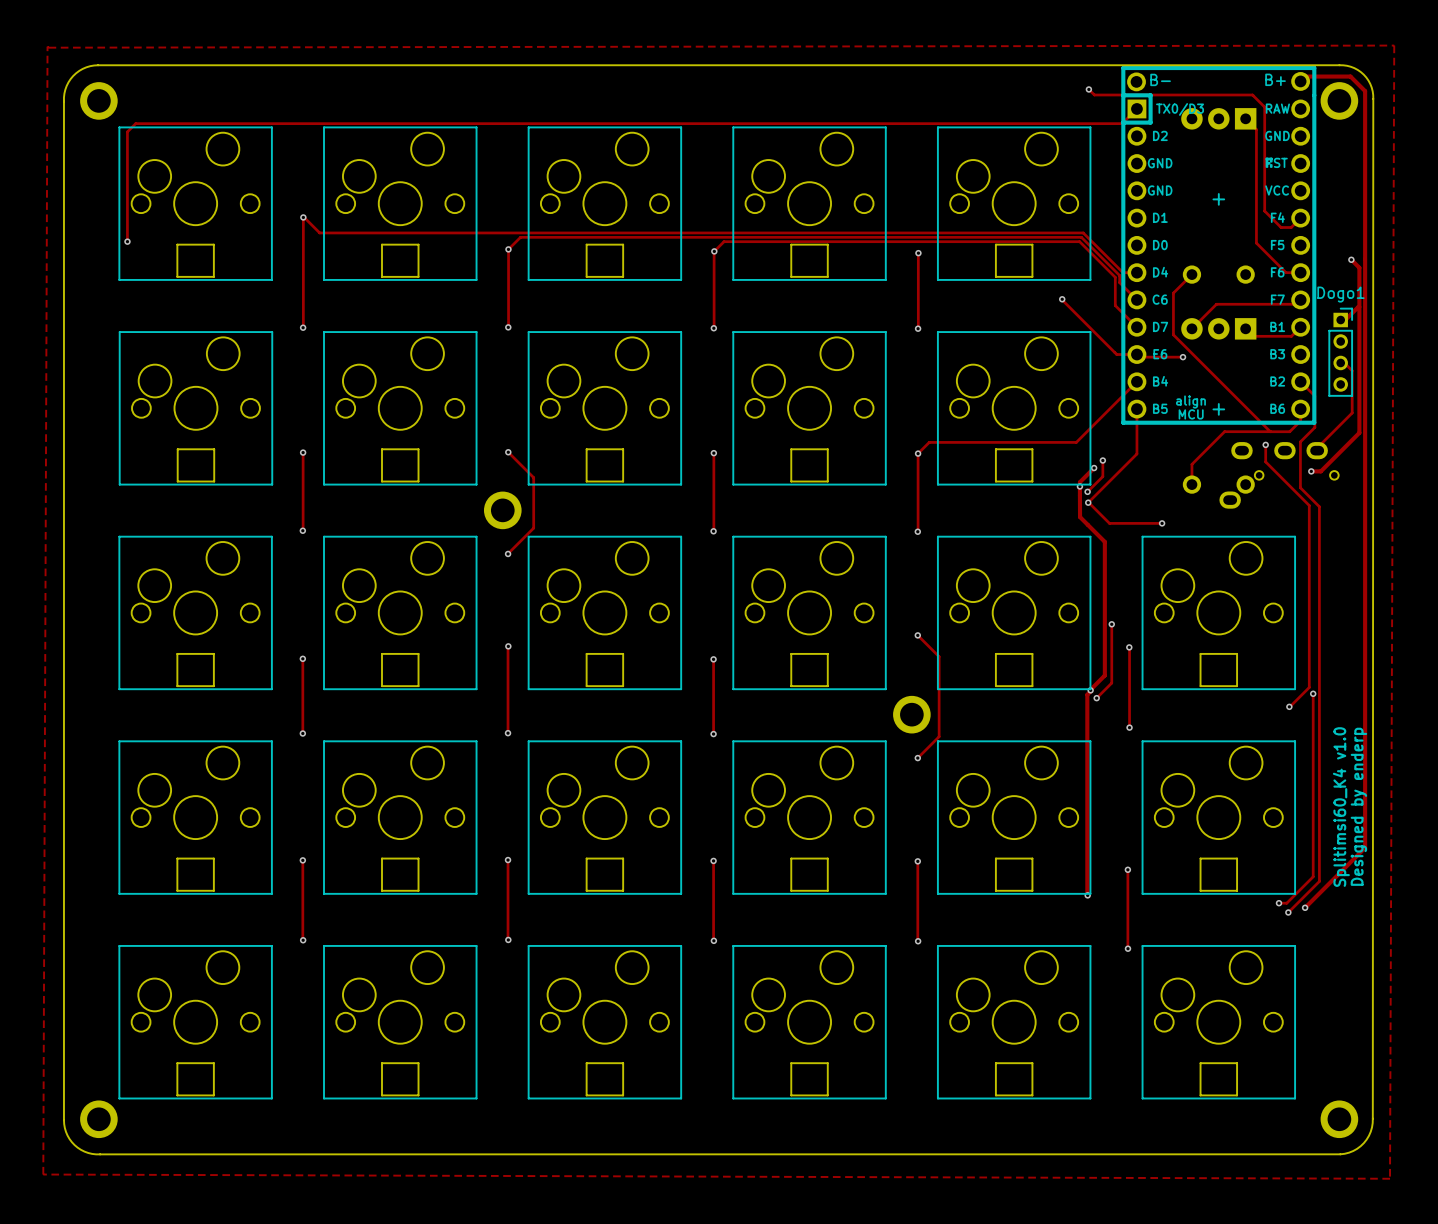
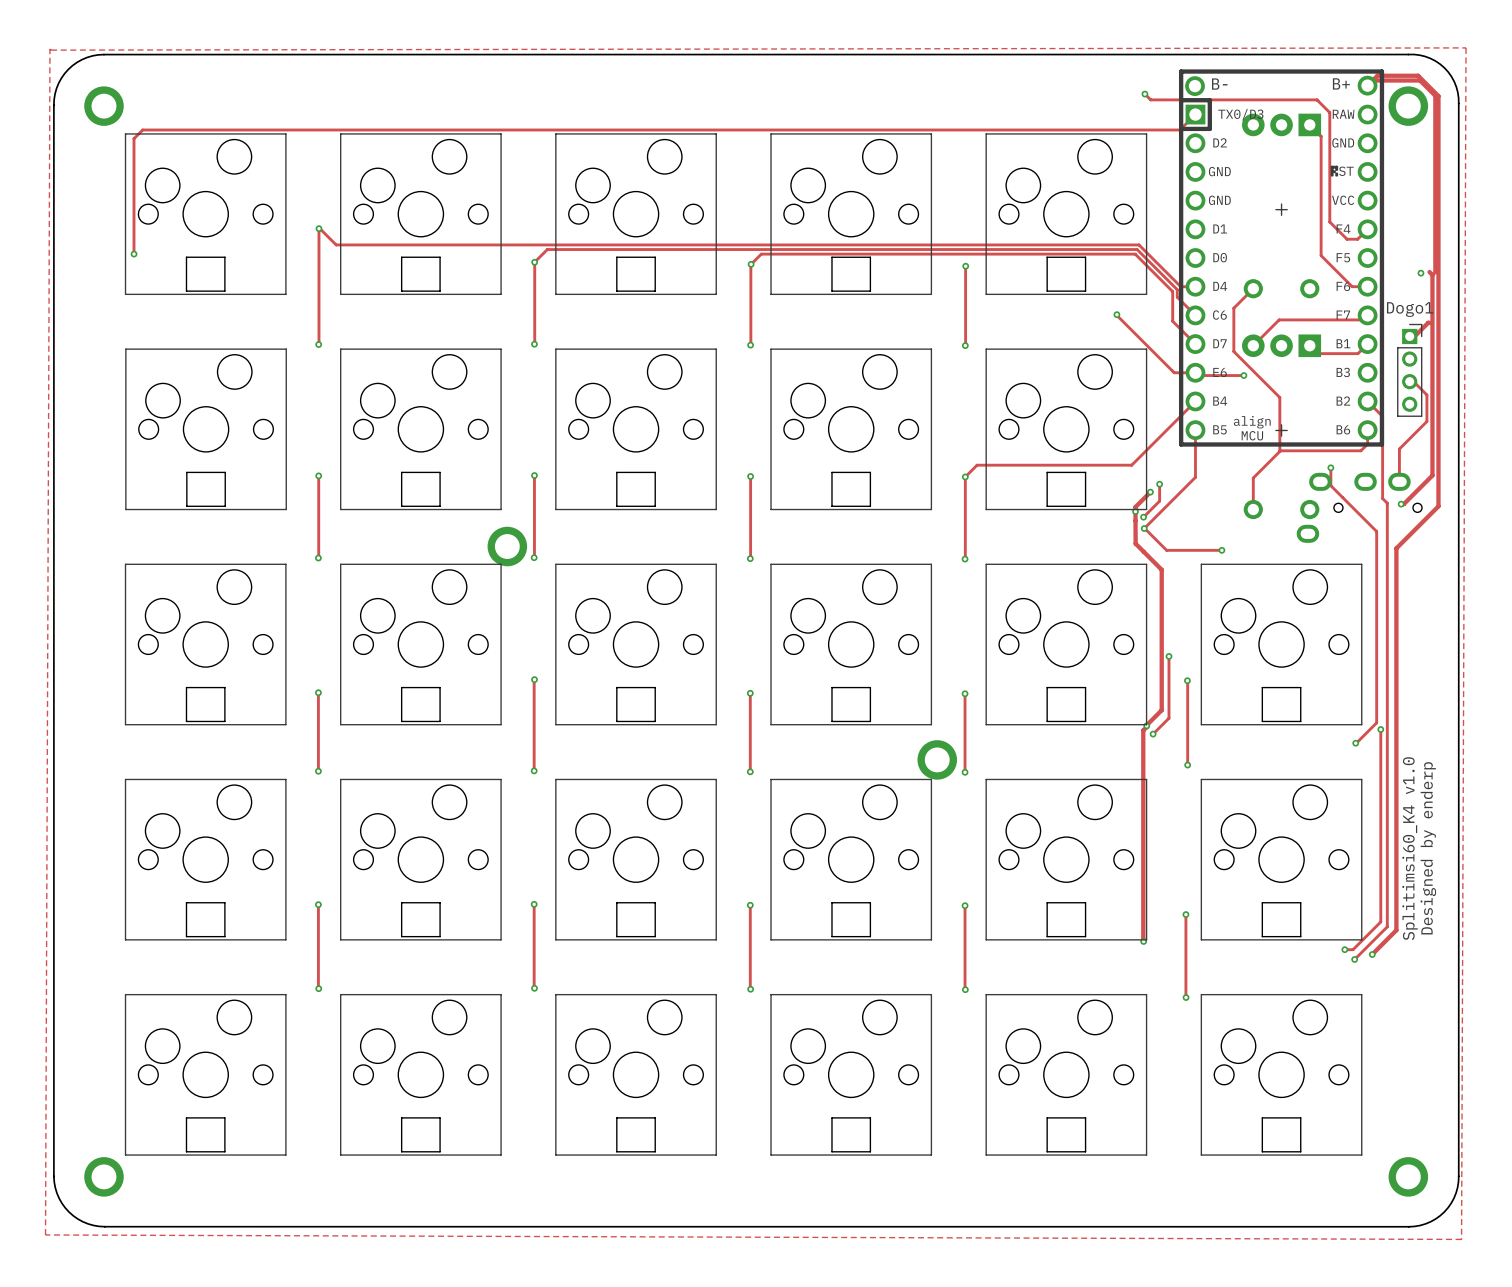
board edge: (98, 65) (1339, 65) (1350, 66) (1360, 72) (1370, 83) (1373, 98) (1372, 1118) (1370, 1131) (1363, 1143) (1353, 1151) (1340, 1154) (96, 1154) (84, 1151) (74, 1145) (65, 1131) (63, 1120) (63, 97) (66, 85) (73, 75) (86, 67) (98, 65) -> (1408, 54) (104, 54) (87, 57) (72, 65) (58, 83) (53, 105) (53, 1176) (56, 1193) (65, 1207) (82, 1221) (104, 1226) (1408, 1226) (1425, 1223) (1440, 1215) (1454, 1198) (1458, 1176) (1458, 97) (1454, 81) (1444, 67) (1430, 58) (1408, 54)
track: none -> (1429, 272) (1432, 274) (1432, 475) (1403, 504) (1401, 504)
track: (1351, 259) (1359, 267) (1359, 432) (1320, 471) (1311, 471) -> none
track: (1365, 259) (1365, 847) (1305, 907) -> (1372, 80) (1377, 75) (1418, 75) (1438, 96) (1438, 506) (1396, 548) (1396, 930) (1372, 954)
track: (1173, 334) (1270, 431) -> (1233, 351) (1279, 397) (1279, 450) (1360, 450) (1367, 442)
track: (1352, 370) (1352, 412) (1316, 448) -> (1421, 389) (1426, 394) (1426, 421) (1399, 449) (1399, 481)
track: (1300, 420) (1289, 431) (1224, 431) (1191, 464) -> (1280, 451) (1253, 477) (1253, 488)
track: (1314, 427) (1300, 441) (1300, 487) (1319, 506) -> (1382, 449) (1382, 498) (1387, 503) (1387, 532)
track: (508, 452) (533, 477) (533, 528) (508, 553) -> (534, 475) (534, 557)
via position: (1311, 471) -> (1401, 504)
part position: (1279, 475) -> (1359, 507)
part position: (502, 510) -> (507, 546)
via position: (508, 553) -> (534, 557)
track: (917, 635) (939, 656) (939, 736) (917, 758) -> none
via position: (917, 635) -> (965, 693)
track: none -> (965, 693) (965, 772)
part position: (911, 714) -> (937, 759)
via position: (917, 758) -> (965, 772)

